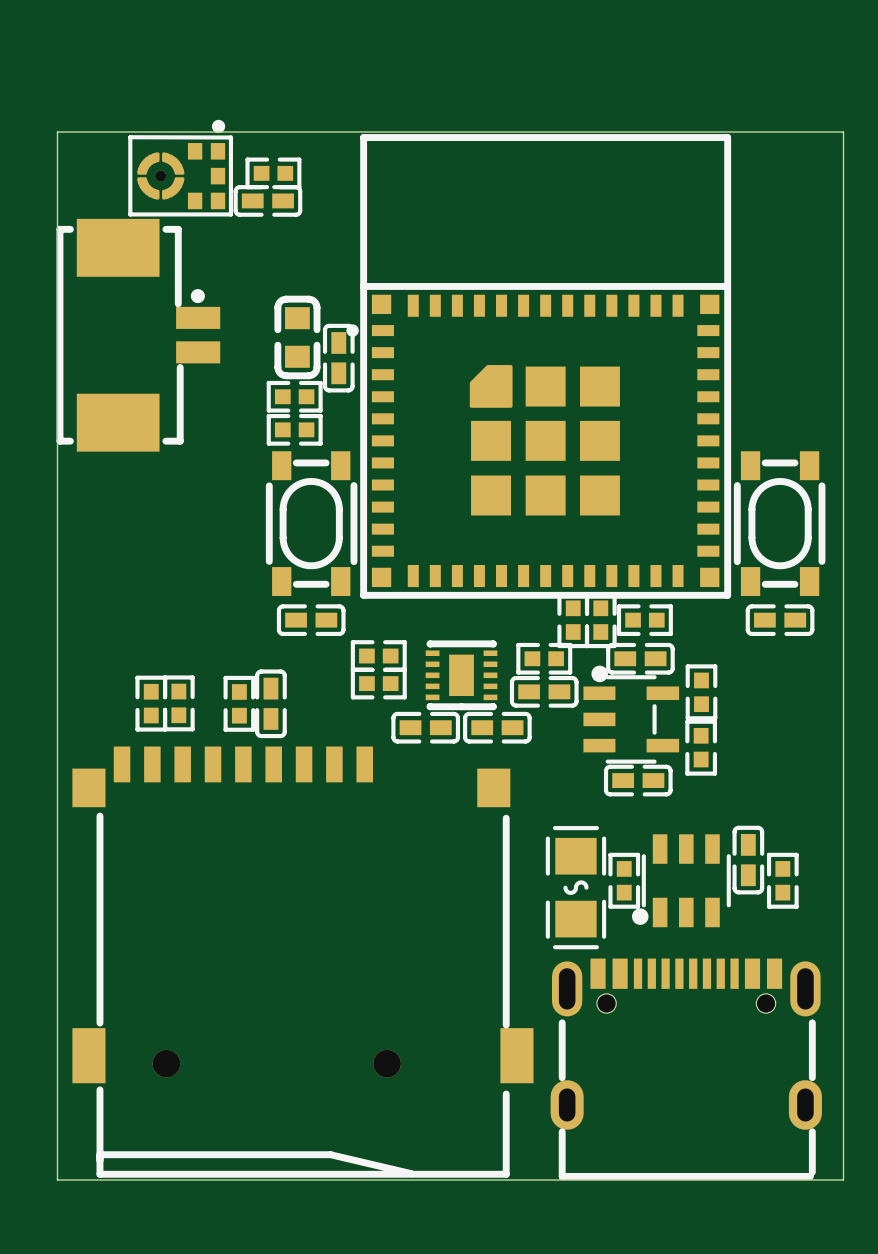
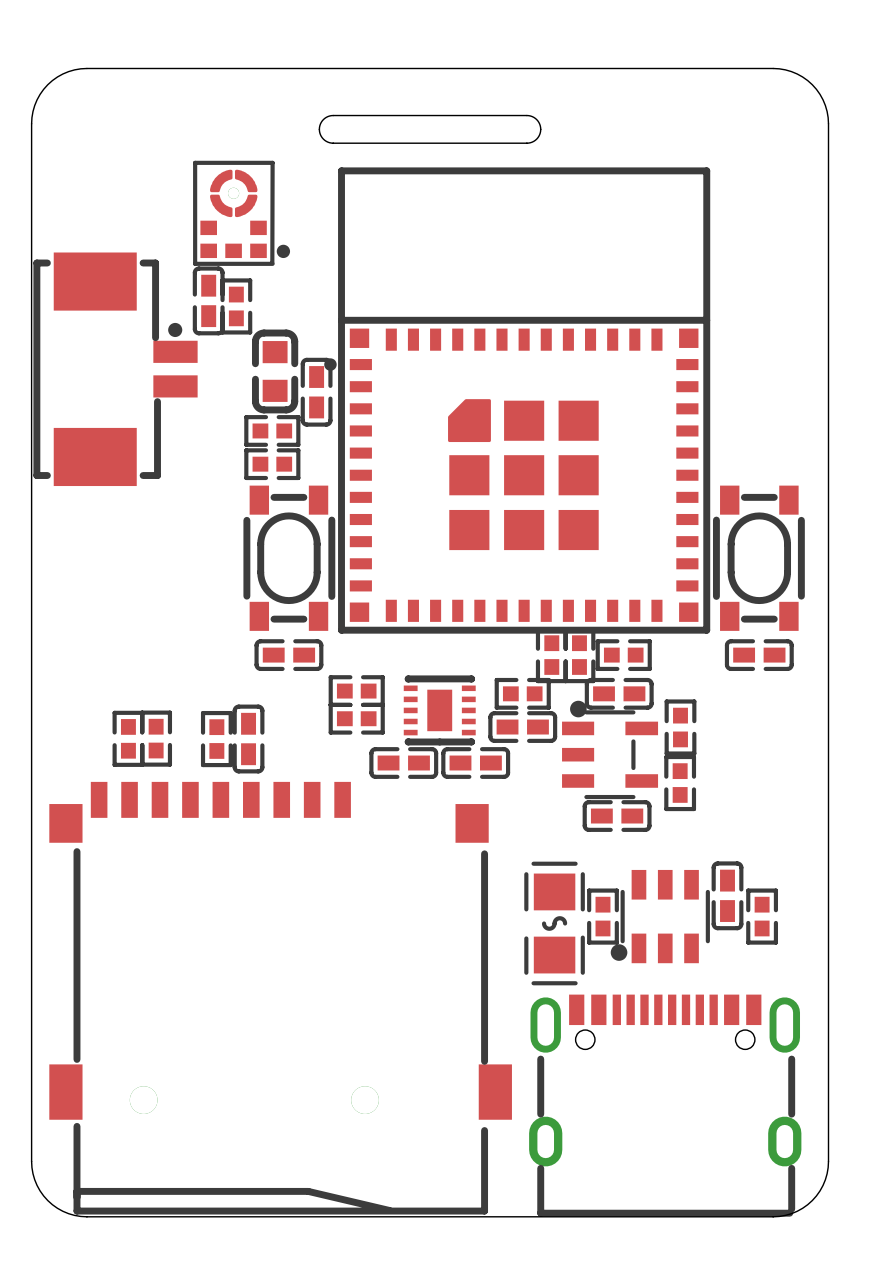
board edge: none -> (333, 115) (528, 115) (537, 120) (540, 131) (536, 139) (526, 143) (331, 143) (322, 137) (319, 129) (323, 119) (333, 115)
part rotation: 0° (180, 168) -> 90° clockwise (241, 213)
part position: (180, 168) -> (241, 213)
part rotation: 0° (273, 173) -> 90° clockwise (236, 306)
part position: (273, 173) -> (236, 306)
part rotation: 0° (267, 200) -> 90° clockwise (208, 300)
part position: (267, 200) -> (208, 300)
board edge: (109, 1180) (57, 1180) (57, 132) (843, 132) (843, 1180) (793, 1180) -> (86, 1216) (68, 1213) (47, 1200) (37, 1185) (31, 1161) (31, 123) (34, 105) (47, 84) (68, 71) (86, 68) (773, 68) (785, 69) (802, 76) (820, 94) (827, 111) (828, 123) (828, 1161) (823, 1185) (812, 1200) (797, 1211) (773, 1216)

